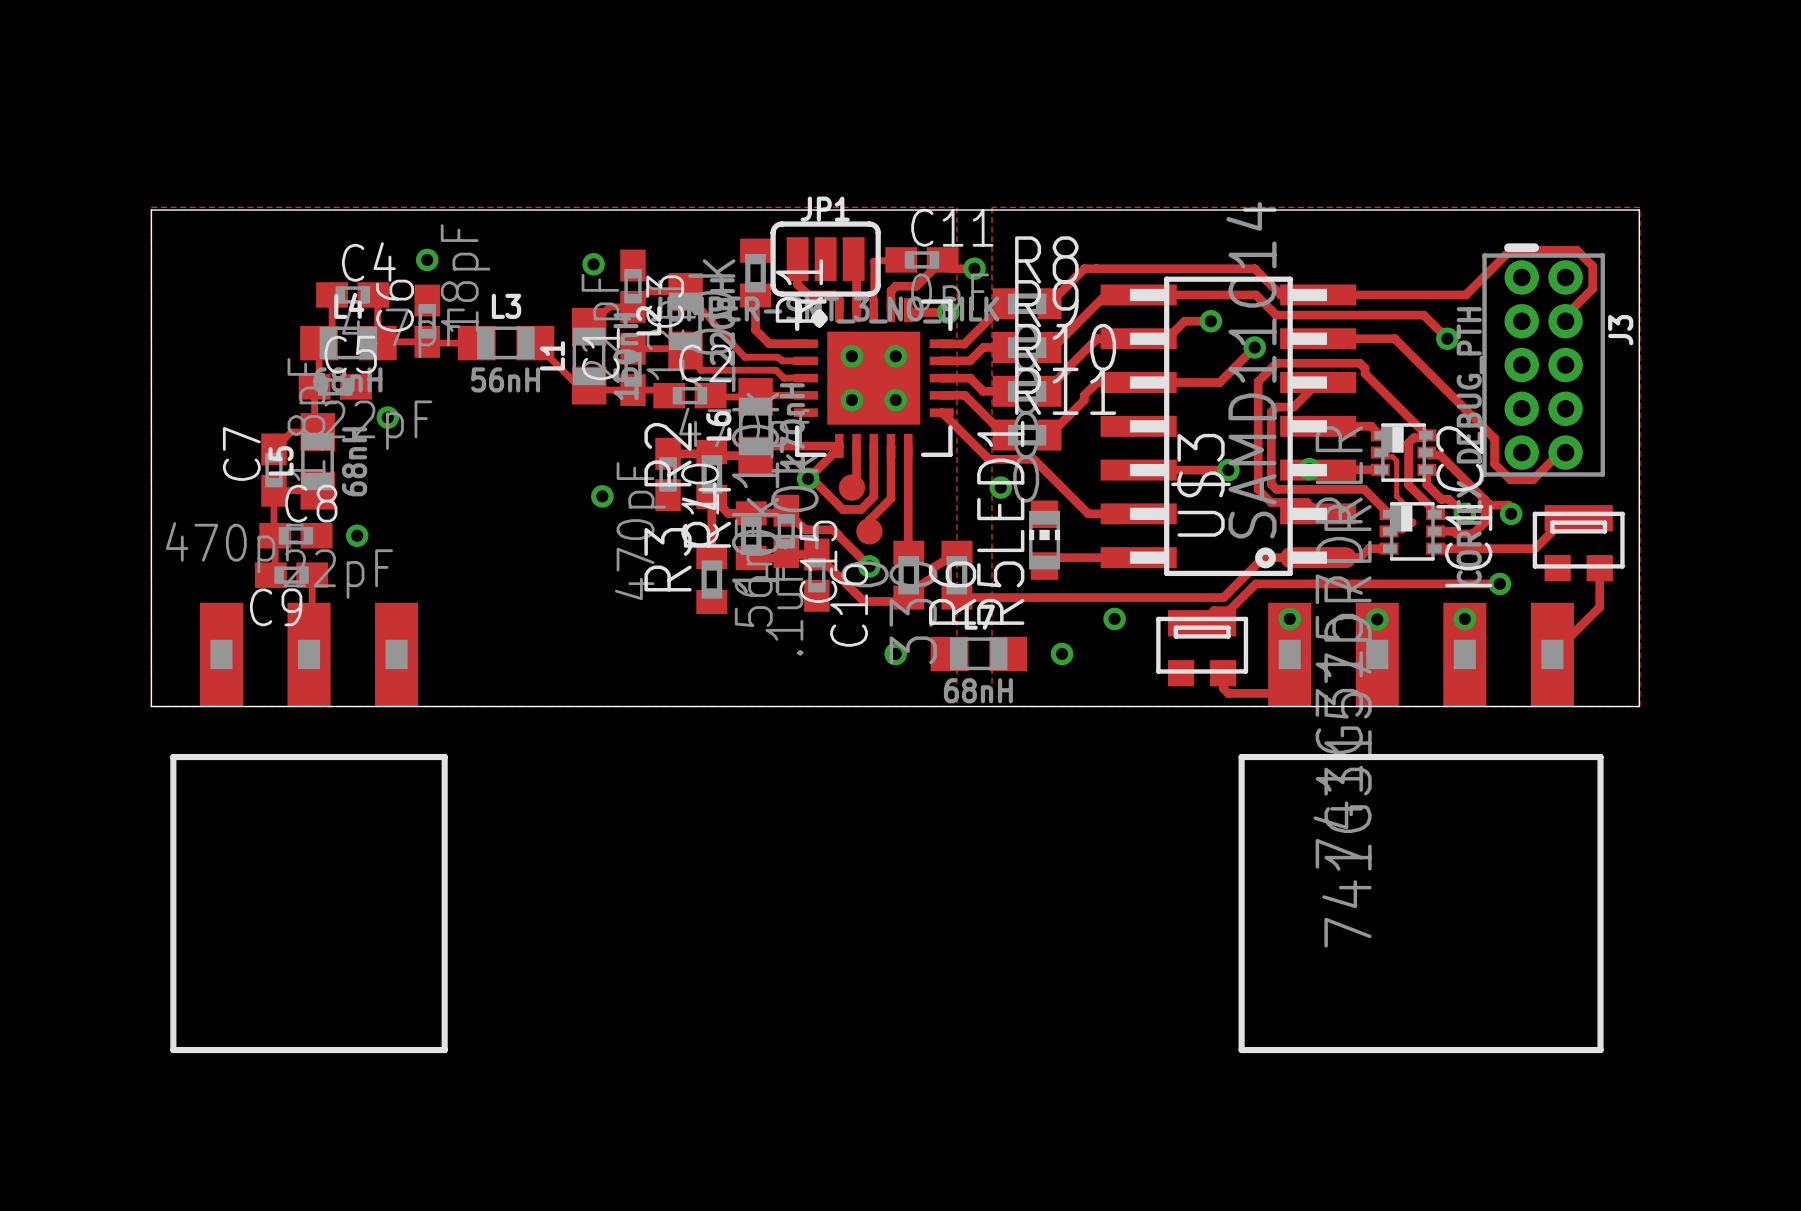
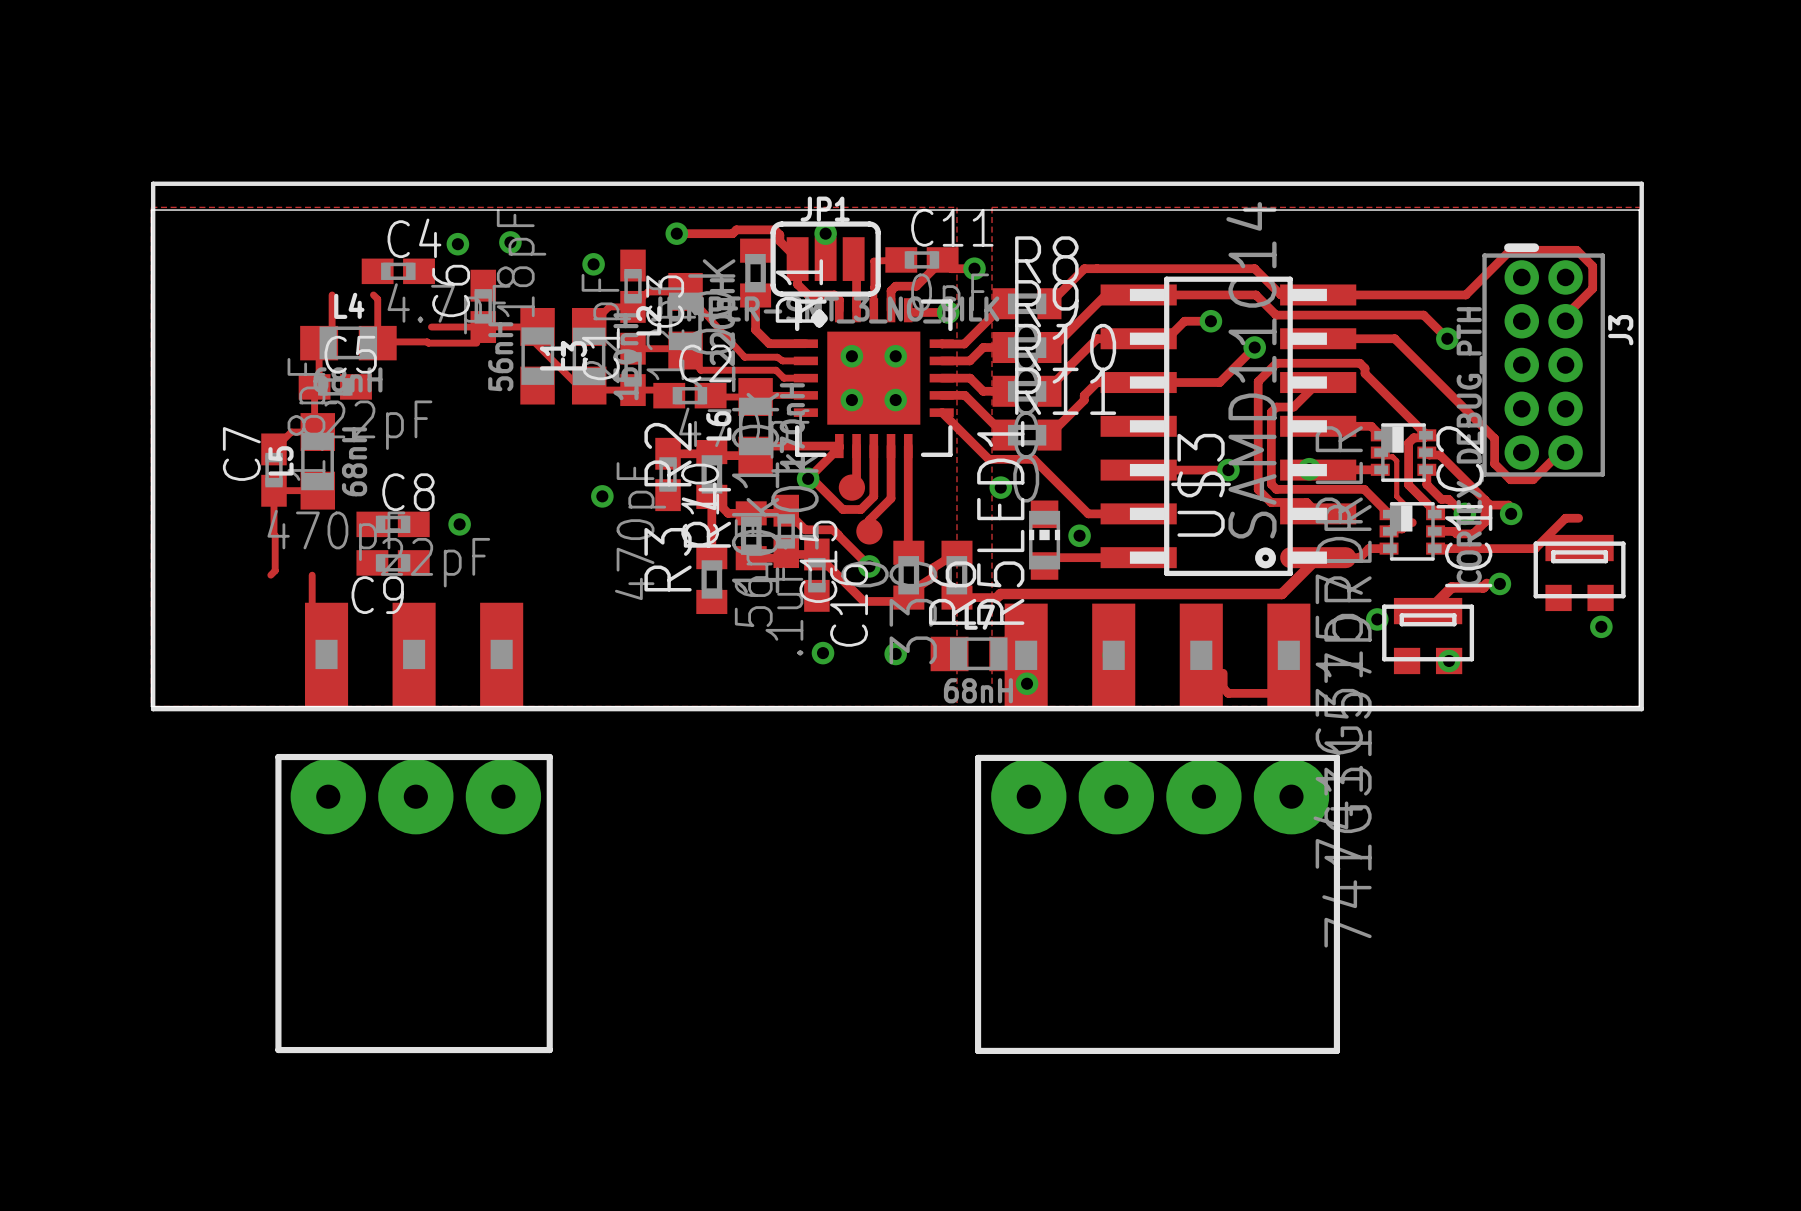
track: none -> (676, 233) (732, 233) (736, 229) (774, 229) (779, 234) (779, 241) (797, 259)
via: none -> (676, 233)
via: none -> (825, 233)
via: none -> (510, 242)
via position: (427, 259) -> (457, 244)
C4 position: (352, 294) -> (398, 271)
C6 position: (427, 321) -> (483, 306)
track: none -> (431, 327) (537, 326)
L3 rotation: 0° (506, 343) -> 90° clockwise (537, 356)
via: (387, 417) -> none
part: none -> (897, 507)
via: none -> (459, 524)
C8 position: (295, 535) -> (393, 524)
via: (357, 535) -> none
via: none -> (1079, 535)
part position: (1578, 543) -> (1579, 572)
track: (1318, 557) (1263, 557) (1223, 597) (997, 597) -> (1318, 557) (1281, 593) (1000, 593) (997, 597)
track: (1599, 568) (1599, 607) (1552, 654) -> none
C9 position: (291, 575) -> (393, 562)
track: (1486, 583) (1255, 583) (1228, 610) (1213, 610) (1208, 616) (1208, 625) (1202, 623) -> (1486, 583) (1483, 587) (1451, 587) (1428, 611)
via: (1114, 618) -> none
via: (1289, 618) -> none
via position: (1464, 618) -> (1449, 660)
via: none -> (1601, 626)
part position: (1202, 648) -> (1428, 636)
via: none -> (823, 653)
via: (1062, 653) -> none
via: none -> (1027, 683)
part position: (309, 827) -> (414, 827)
part position: (1421, 827) -> (1157, 828)

